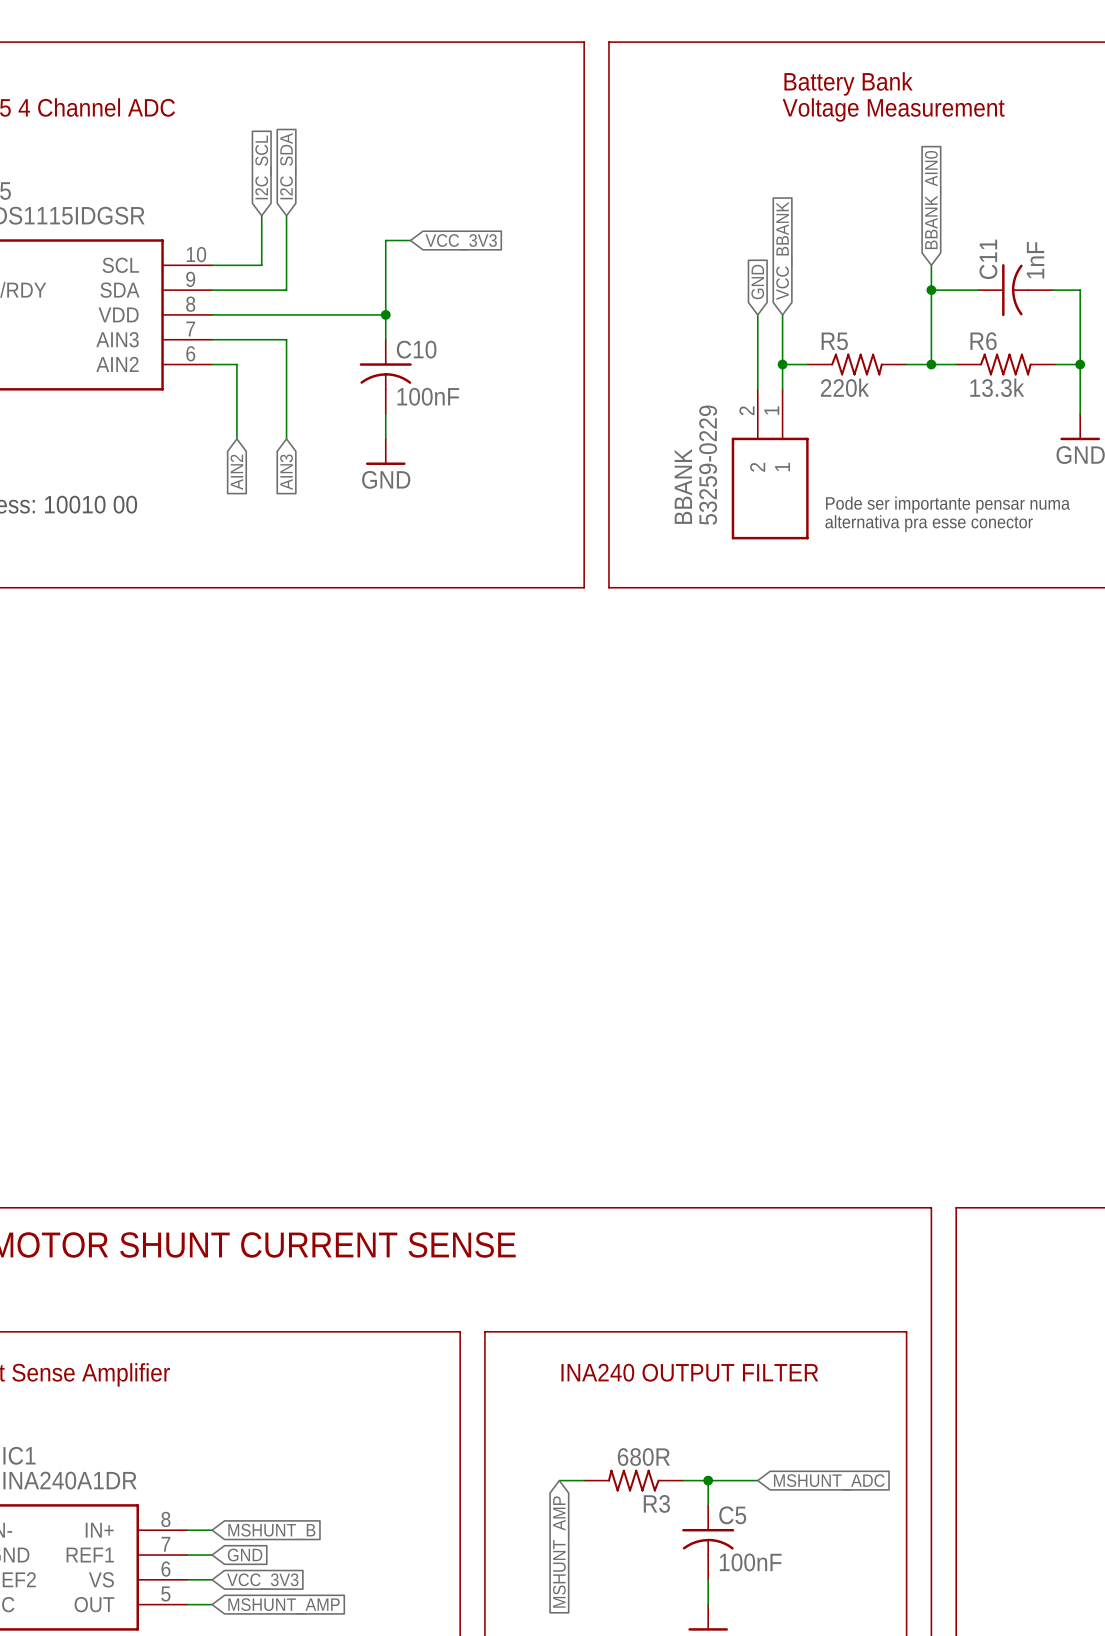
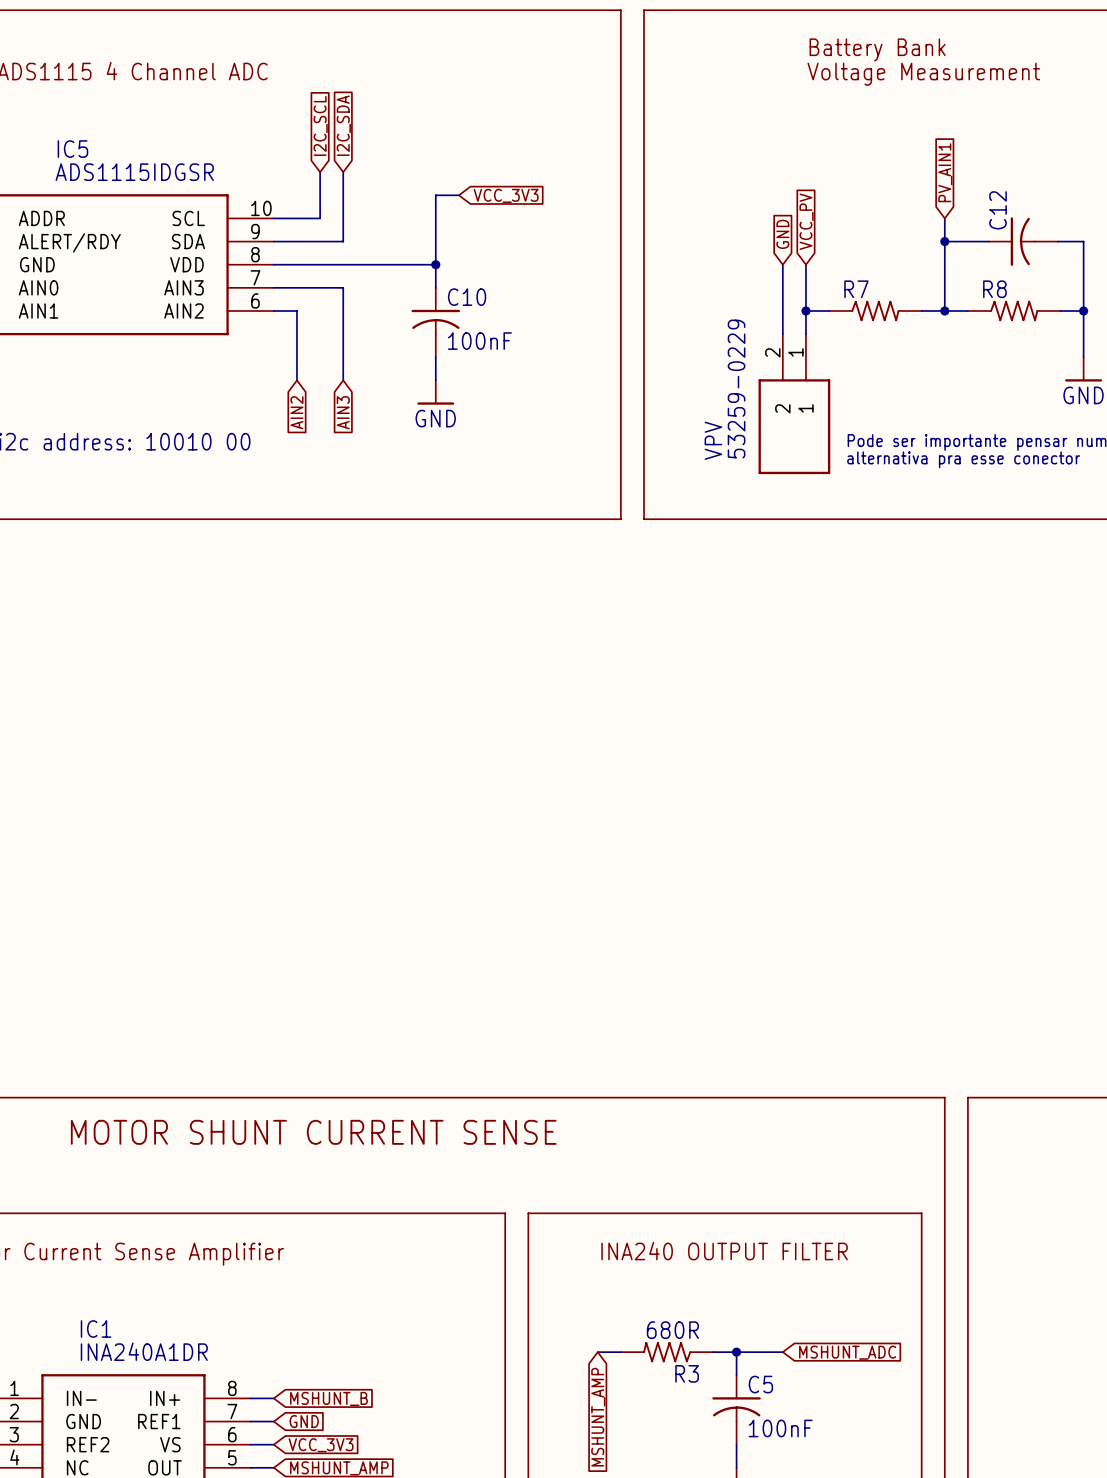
global label: BBANK_AIN0 (933, 200) -> PV_AIN1 (945, 172)
global label: VCC_BBANK (784, 250) -> VCC_PV (806, 221)
C11 name: C11 (988, 259) -> C12 (998, 210)
C11 value: 1nF (1035, 260) -> none
R5 name: R5 (834, 341) -> R7 (856, 289)
R6 name: R6 (983, 341) -> R8 (994, 289)
R5 value: 220k (844, 387) -> none
R6 value: 13.3k (997, 387) -> none
BBANK name: BBANK (683, 486) -> VPV (713, 440)

